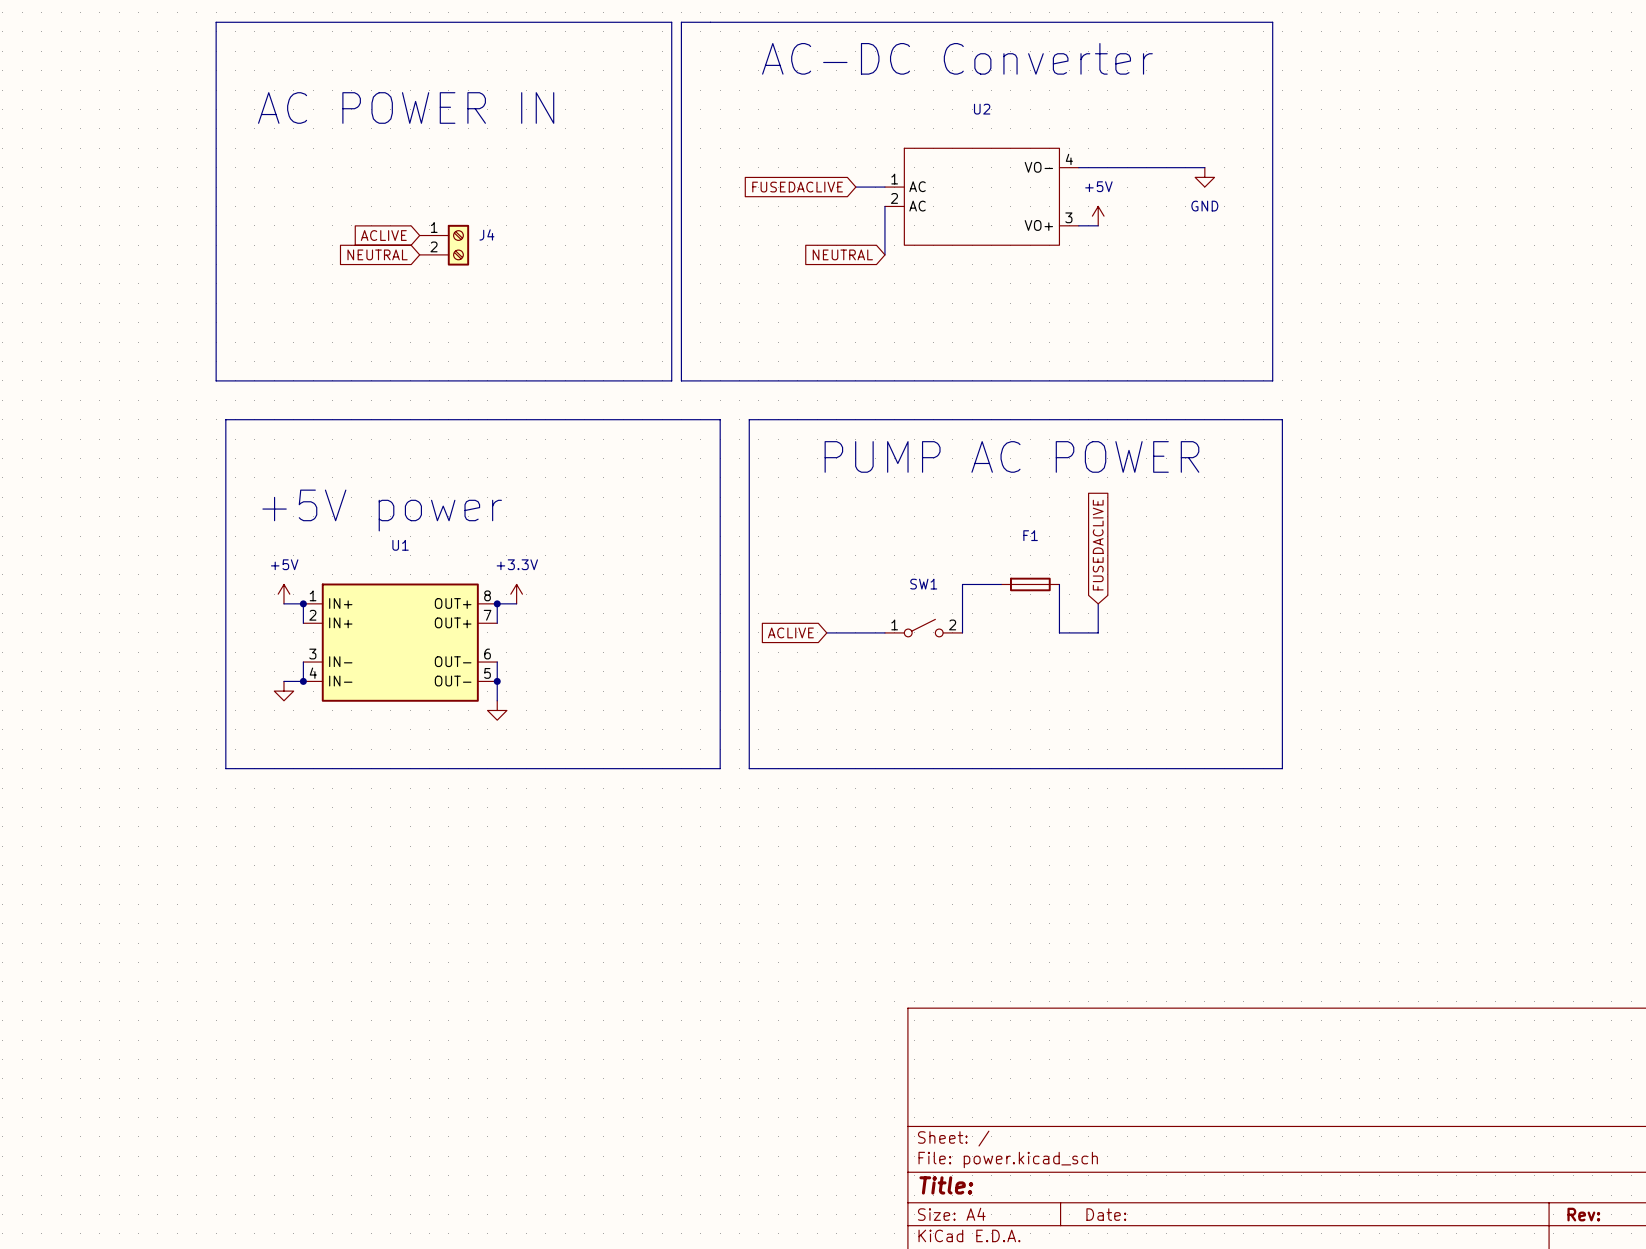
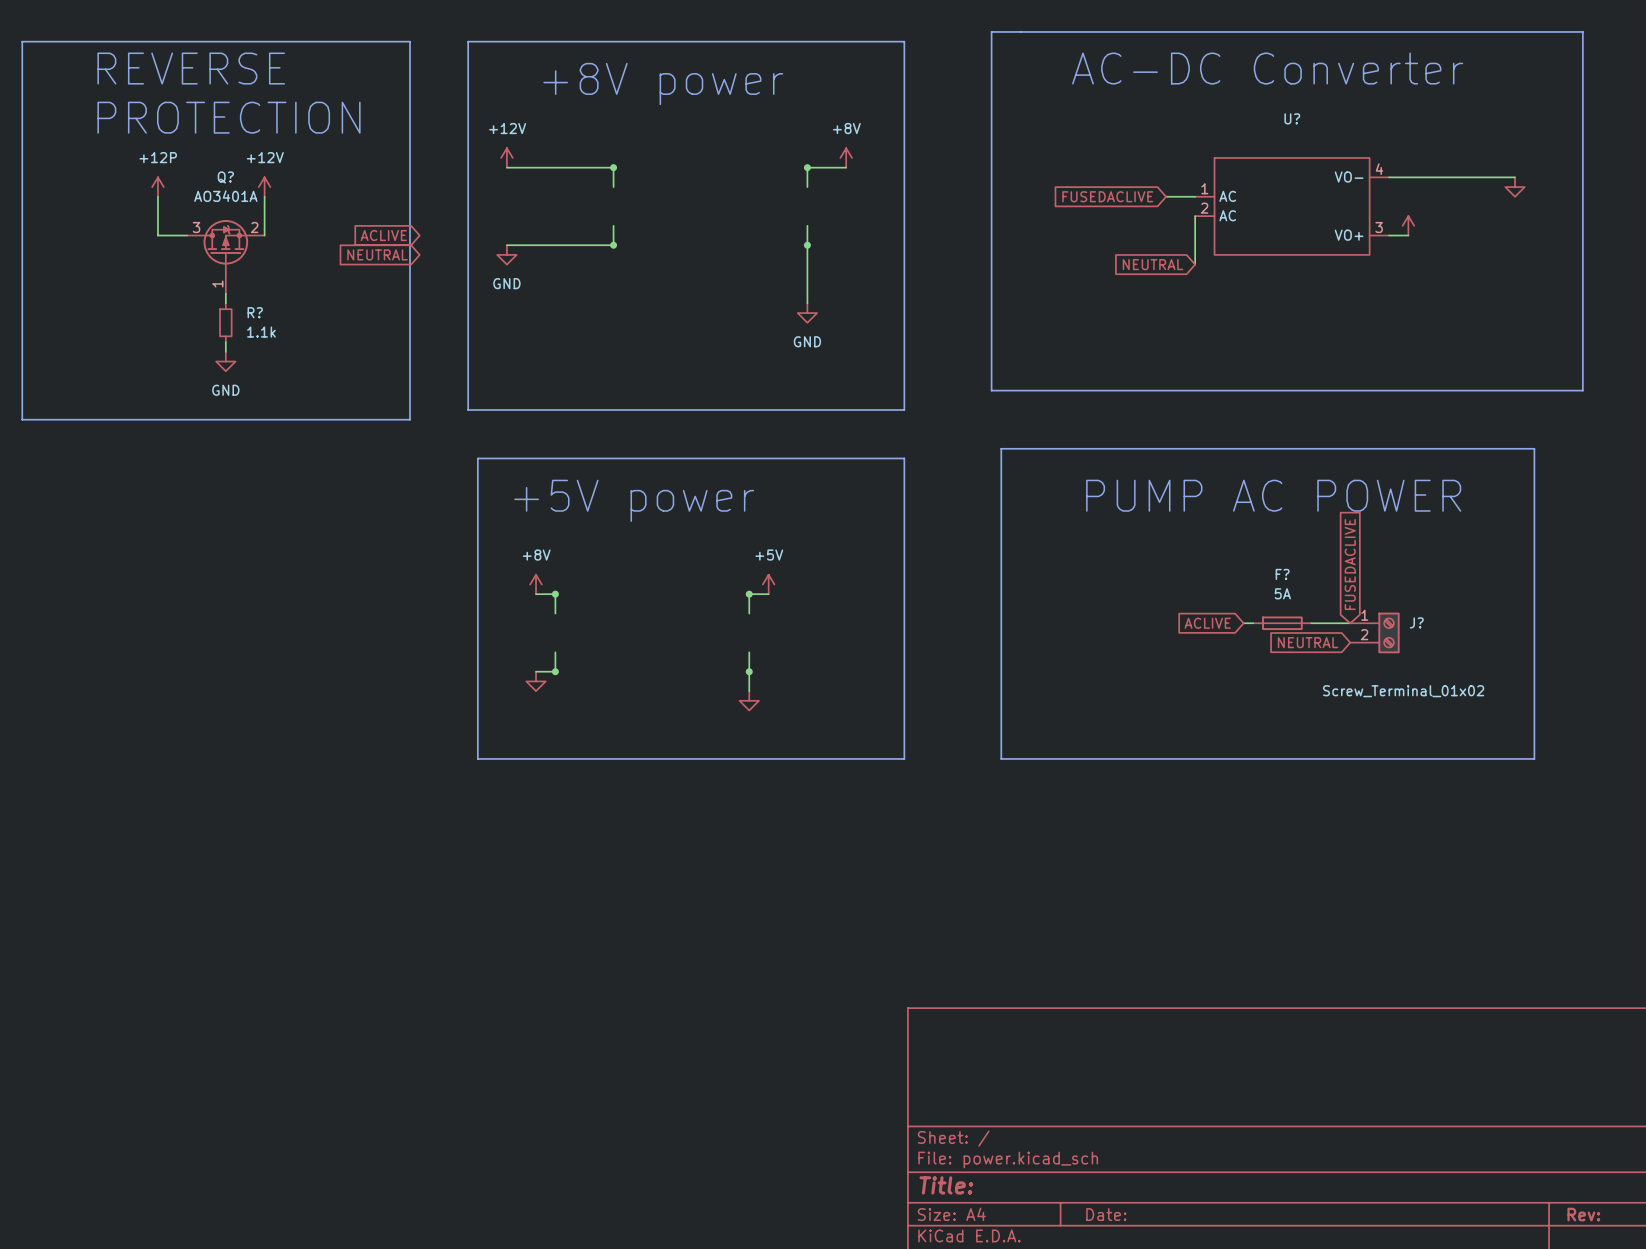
line: (216, 22) (216, 380) (671, 380) (671, 22) (216, 22) -> none
line: (681, 22) (1272, 22) (1272, 380) (681, 380) (681, 22) -> none
line: none -> (991, 31) (991, 390) (1582, 390) (1582, 31) (991, 31)
line: none -> (468, 41) (904, 41) (904, 410) (468, 410) (468, 41)
text: AC-DC Converter (957, 58) -> none
text: none -> REVERSE (191, 68)
text: none -> AC-DC Converter (1267, 68)
text: none -> +8V power (663, 84)
text: AC POWER IN (406, 107) -> none
text: none -> PROTECTION (229, 117)
power symbol: none -> +12V (506, 157)
power symbol: none -> +8V (846, 157)
wire: none -> (506, 167) (613, 167) (613, 187)
junction: none -> (613, 167)
junction: none -> (807, 167)
wire: none -> (846, 167) (807, 167) (807, 187)
wire: (1078, 167) (1204, 167) -> none
power symbol: GND (1204, 177) -> none
wire: none -> (1389, 177) (1515, 177)
power symbol: none -> +12P (157, 187)
power symbol: none -> +12V (264, 187)
global label: FUSEDACLIVE (797, 187) -> none
wire: (855, 187) (884, 187) -> none
power symbol: none -> (1515, 187)
wire: none -> (157, 196) (157, 235) (187, 235)
wire: none -> (264, 196) (264, 235)
U2: (981, 196) -> none
global label: none -> FUSEDACLIVE (1107, 196)
wire: none -> (1166, 196) (1195, 196)
wire: (884, 206) (884, 254) -> none
U?: none -> (1292, 206)
power symbol: +5V (1098, 216) -> none
wire: none -> (1195, 216) (1195, 264)
wire: none -> (613, 225) (613, 245) (506, 245)
wire: none -> (807, 225) (807, 303)
wire: (1078, 225) (1098, 225) -> none
power symbol: none -> (1408, 225)
wire: none -> (1389, 235) (1408, 235)
J4: (444, 245) -> none
junction: none -> (613, 245)
junction: none -> (807, 245)
power symbol: none -> GND (506, 254)
global label: NEUTRAL (842, 254) -> none
Q?: none -> AO3401A (225, 256)
global label: none -> NEUTRAL (1153, 264)
wire: none -> (225, 293) (225, 303)
power symbol: none -> GND (807, 313)
R?: none -> 1.1k (225, 322)
wire: none -> (225, 342) (225, 351)
power symbol: none -> GND (225, 361)
line: (225, 419) (225, 768) (720, 768) (720, 419) (410, 419) -> (225, 419) (22, 419) (22, 41) (410, 41) (410, 419)
line: (749, 419) (1282, 419) (1282, 768) (749, 768) (749, 419) -> none
line: none -> (1001, 448) (1534, 448) (1534, 758) (1001, 758) (1001, 448)
text: PUMP AC POWER (1011, 456) -> none
line: none -> (477, 458) (477, 758) (904, 758) (904, 458) (477, 458)
text: none -> PUMP AC POWER (1273, 495)
text: none -> +5V power (634, 500)
text: +5V power (382, 510) -> none
global label: FUSEDACLIVE (1098, 545) -> none
global label: none -> FUSEDACLIVE (1350, 564)
power symbol: none -> +8V (536, 584)
power symbol: none -> +5V (768, 584)
wire: (1001, 584) (962, 584) (962, 632) -> none
F1: (1030, 584) -> none
wire: (1059, 584) (1059, 632) (1098, 632) (1098, 603) -> none
power symbol: +5V (283, 594) -> none
power symbol: +3.3V (516, 594) -> none
wire: none -> (536, 594) (555, 594) (555, 613)
junction: none -> (555, 594)
junction: none -> (749, 594)
wire: none -> (768, 594) (749, 594) (749, 613)
wire: (283, 603) (303, 603) (303, 623) -> none
junction: (303, 603) -> none
junction: (497, 603) -> none
wire: (516, 603) (497, 603) (497, 623) -> none
global label: none -> ACLIVE (1207, 623)
wire: none -> (1243, 623) (1253, 623)
F?: none -> 5A (1282, 623)
wire: none -> (1311, 623) (1350, 623)
SW1: (923, 628) -> none
global label: ACLIVE (790, 632) -> none
wire: (826, 632) (884, 632) -> none
J?: none -> Screw_Terminal_01x02 (1374, 632)
U1: (400, 642) -> none
global label: none -> NEUTRAL (1308, 642)
wire: none -> (555, 652) (555, 671) (536, 671)
wire: (303, 662) (303, 681) (283, 681) -> none
wire: (497, 662) (497, 700) -> none
junction: none -> (555, 671)
junction: none -> (749, 671)
junction: (303, 681) -> none
junction: (497, 681) -> none
power symbol: (283, 691) -> none
power symbol: none -> (749, 700)
power symbol position: (497, 710) -> (536, 681)

